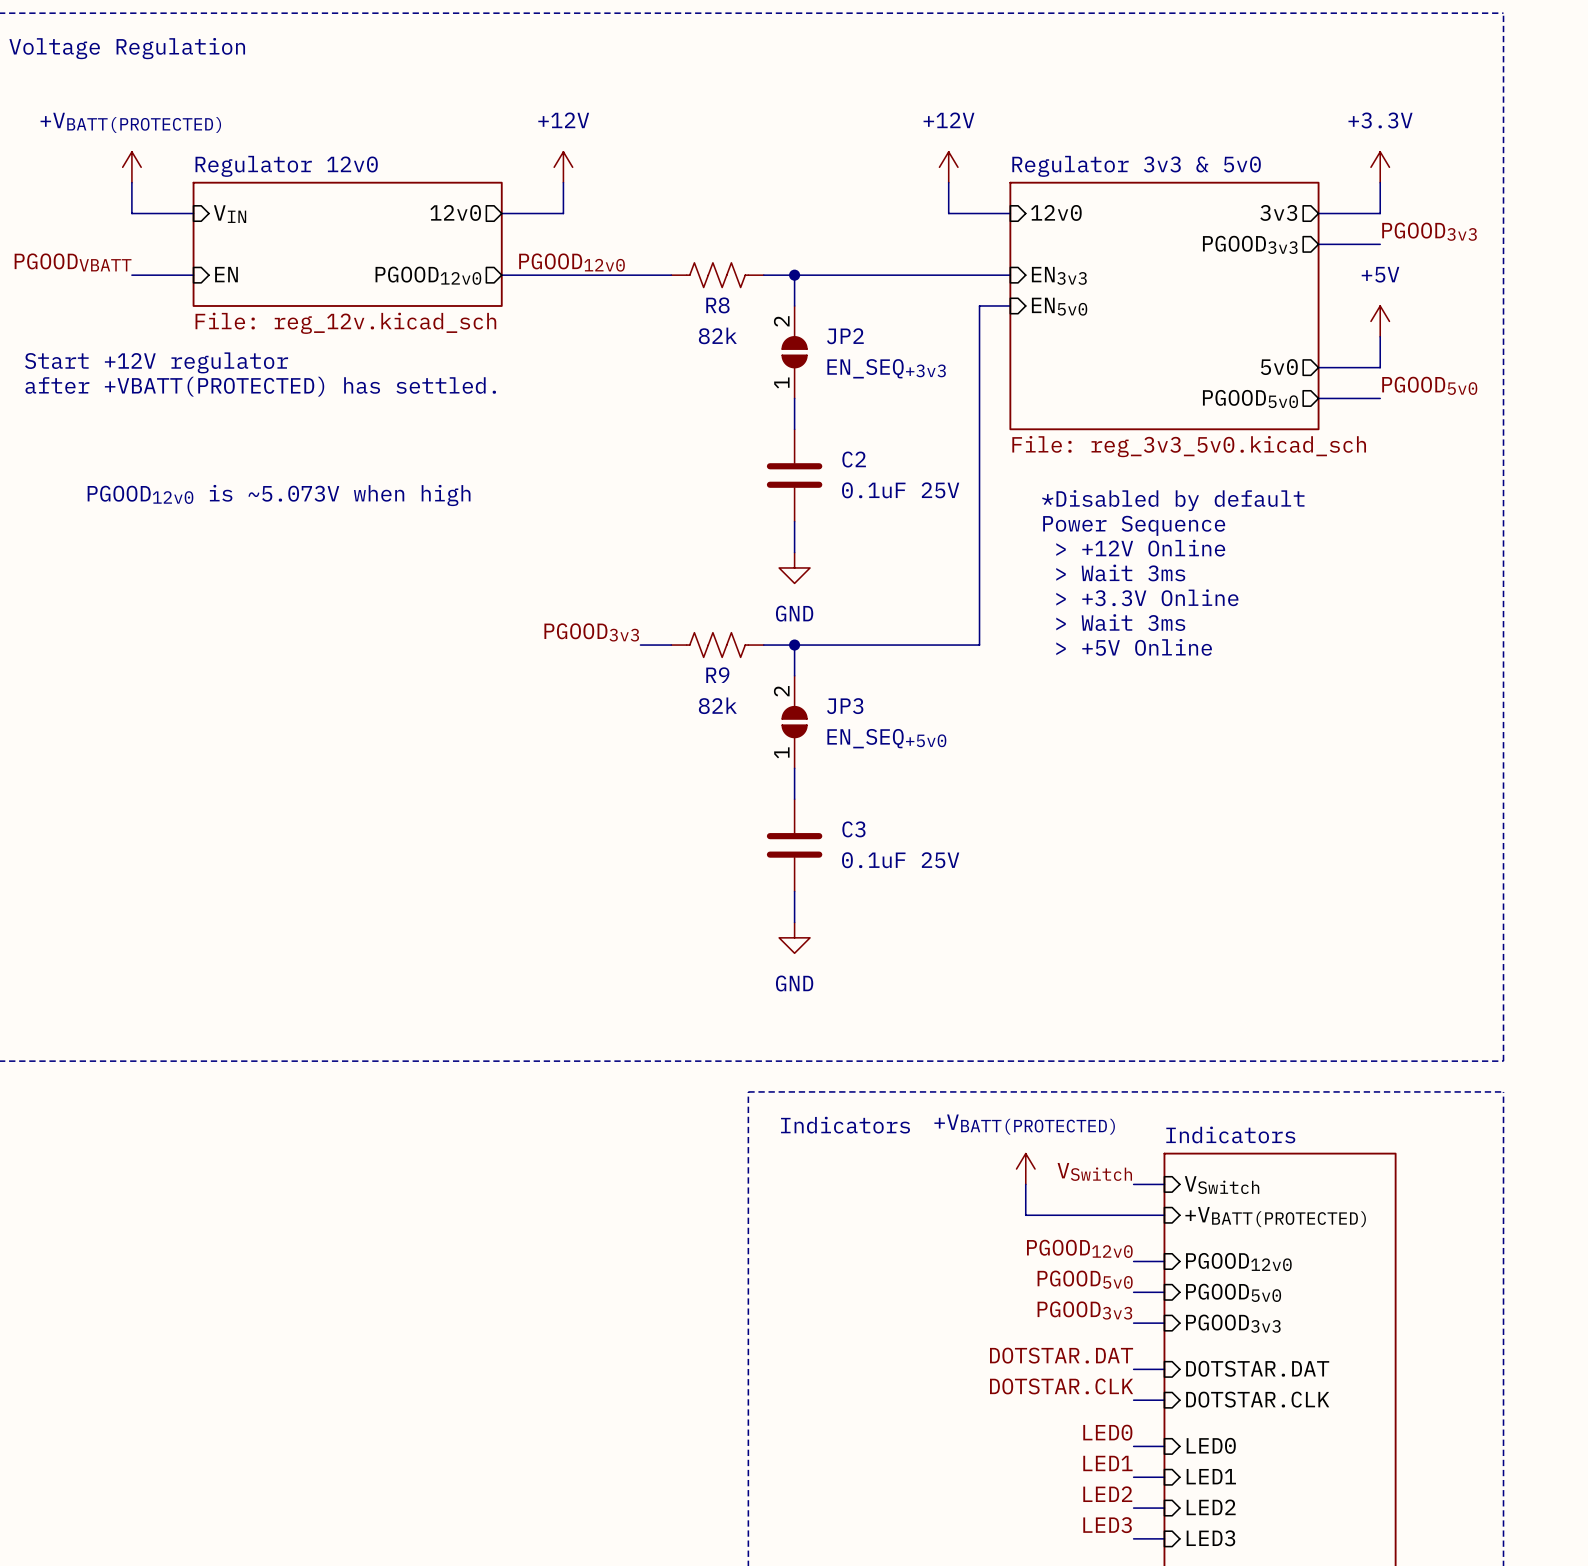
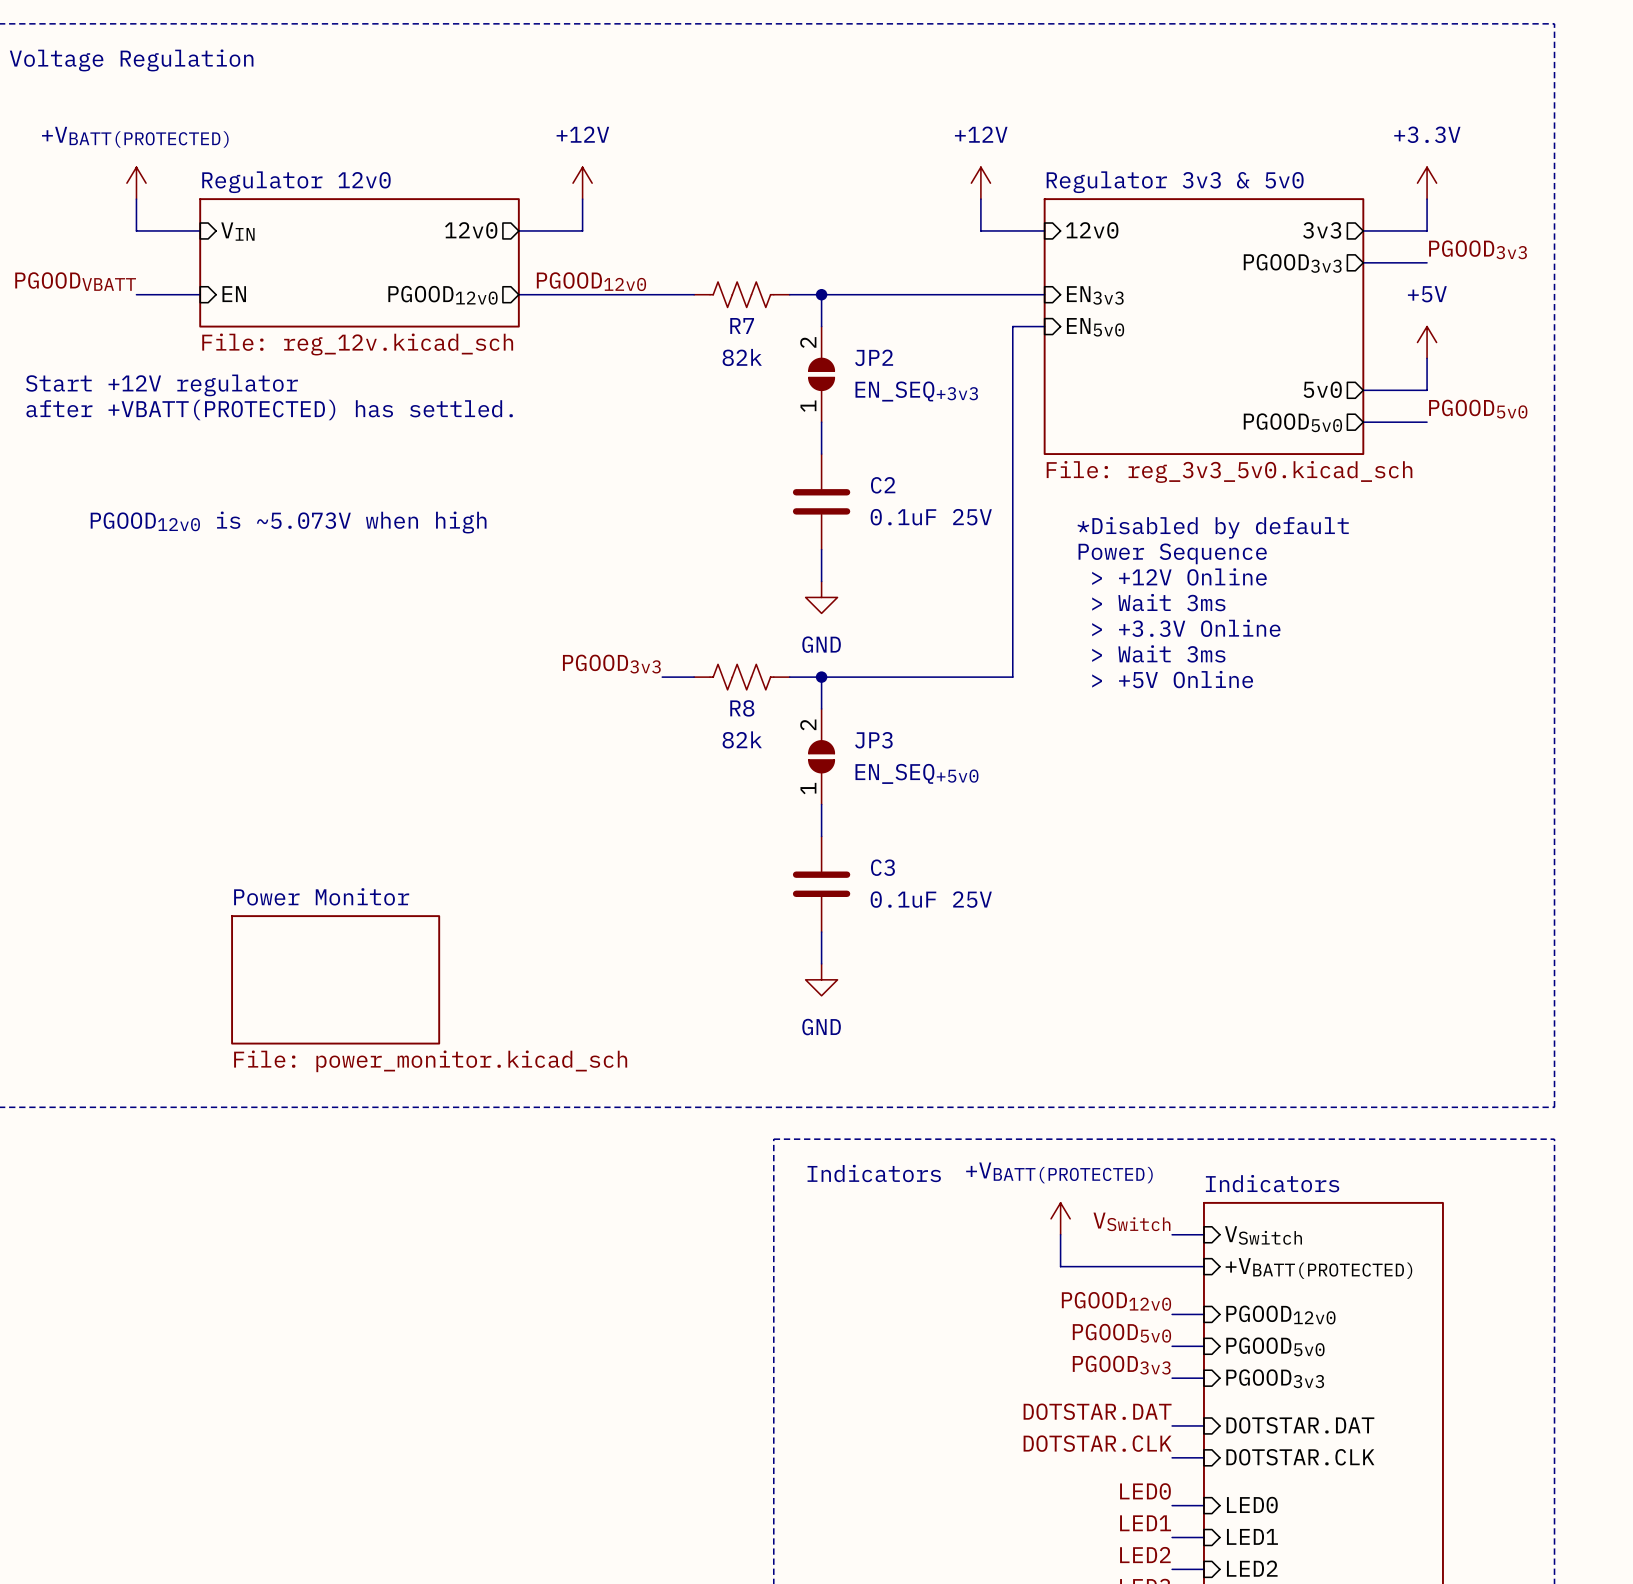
R8 name: R8 (717, 305) -> R7 (742, 325)
R9 name: R9 (717, 675) -> R8 (742, 708)
sheet Power Monitor: none -> File: power_monitor.kicad_sch (335, 979)

